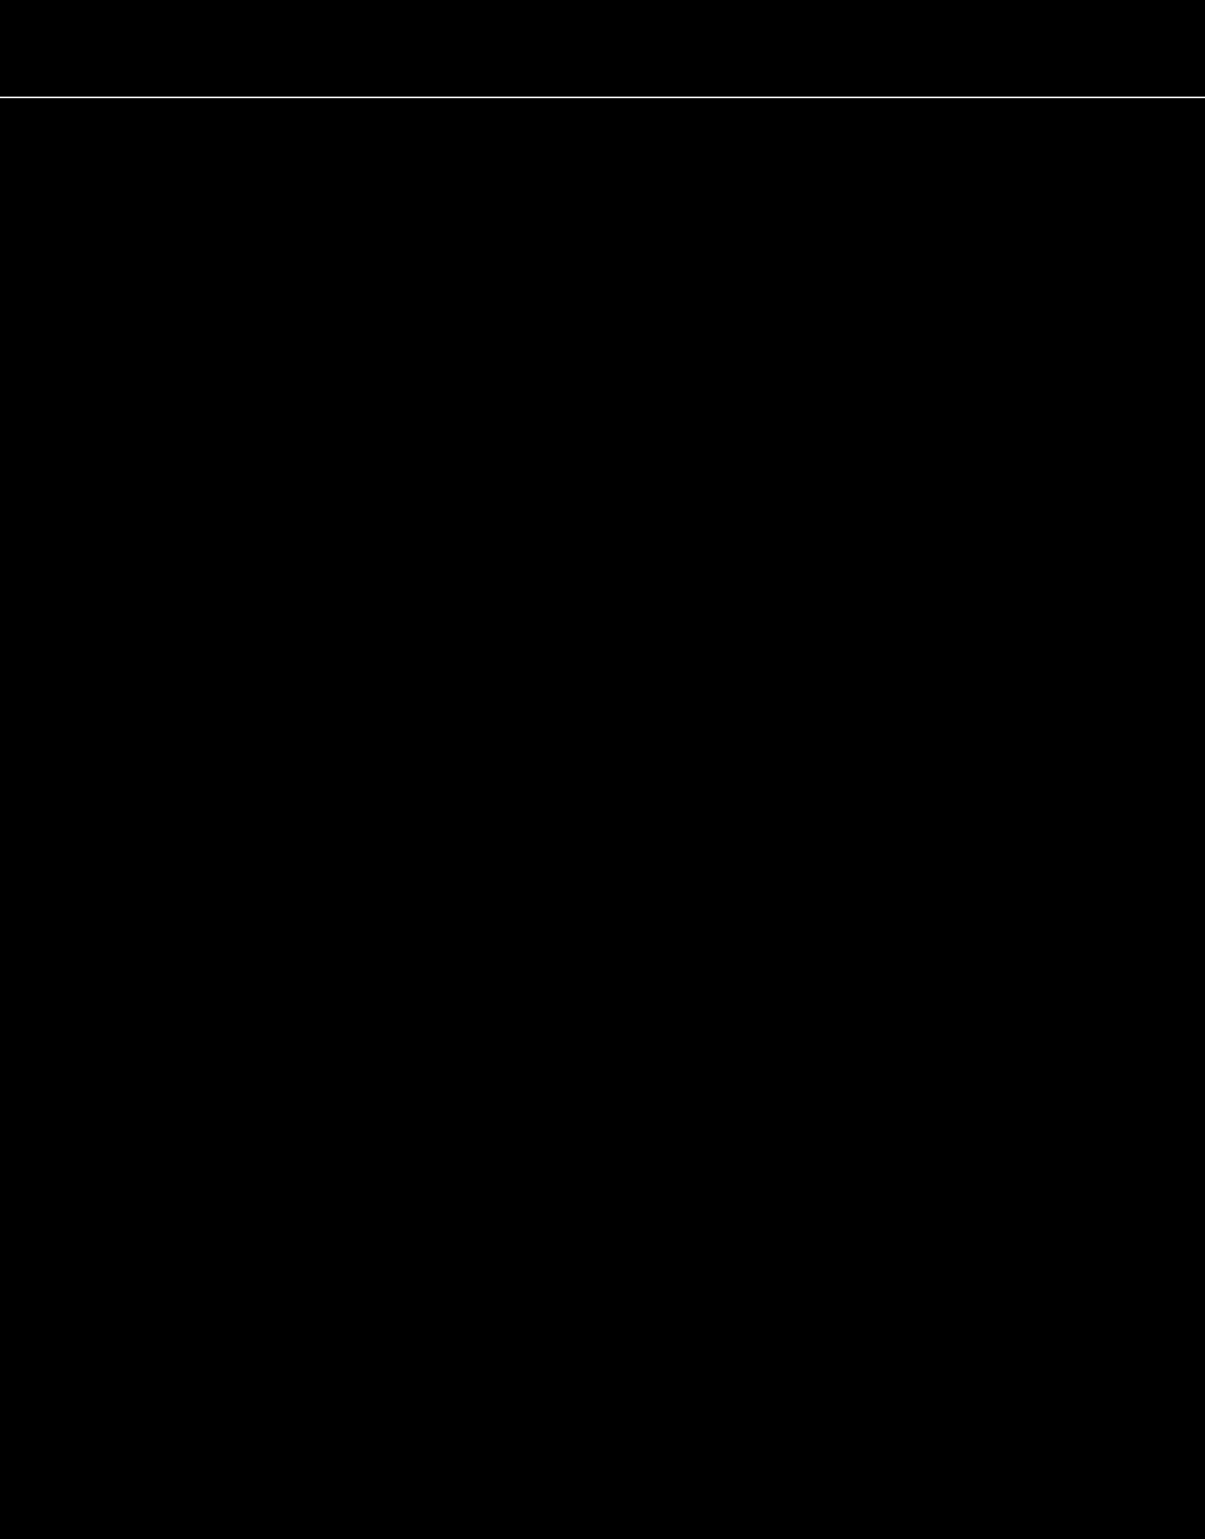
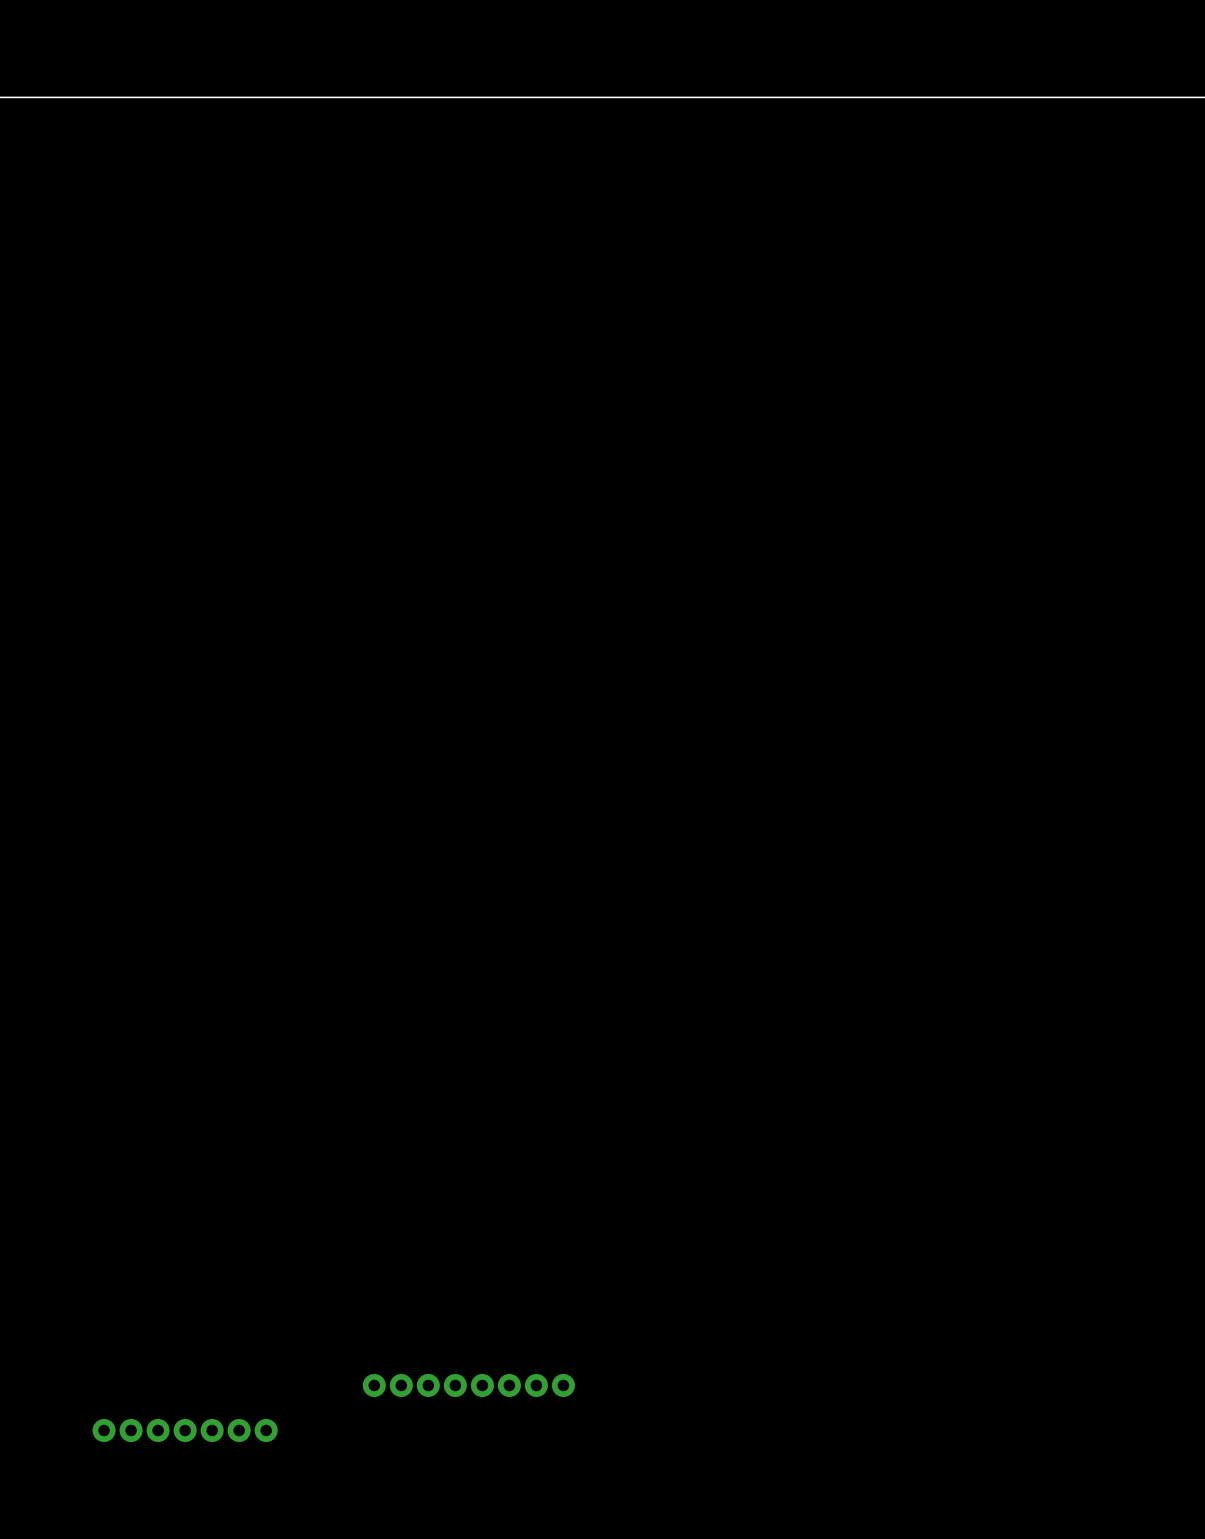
via: none -> (374, 1385)
via: none -> (401, 1385)
via: none -> (428, 1385)
via: none -> (455, 1385)
via: none -> (482, 1385)
via: none -> (509, 1385)
via: none -> (536, 1385)
via: none -> (563, 1385)
via: none -> (104, 1430)
via: none -> (131, 1430)
via: none -> (158, 1430)
via: none -> (185, 1430)
via: none -> (212, 1430)
via: none -> (239, 1430)
via: none -> (266, 1430)

